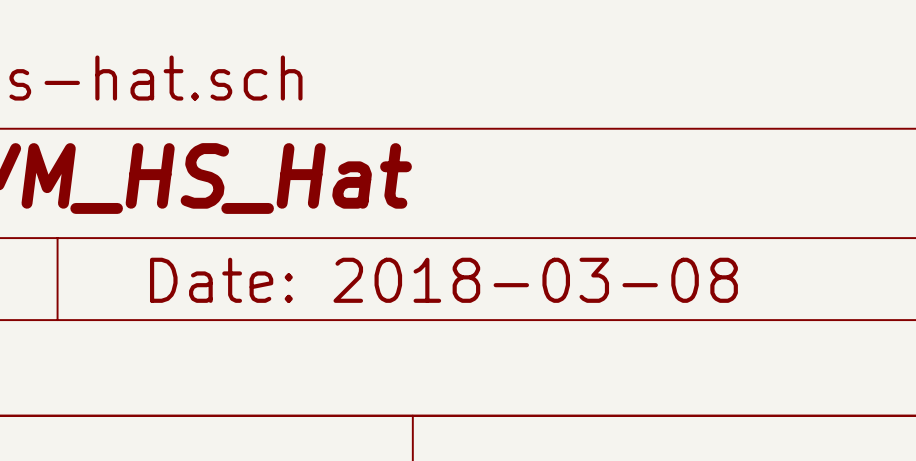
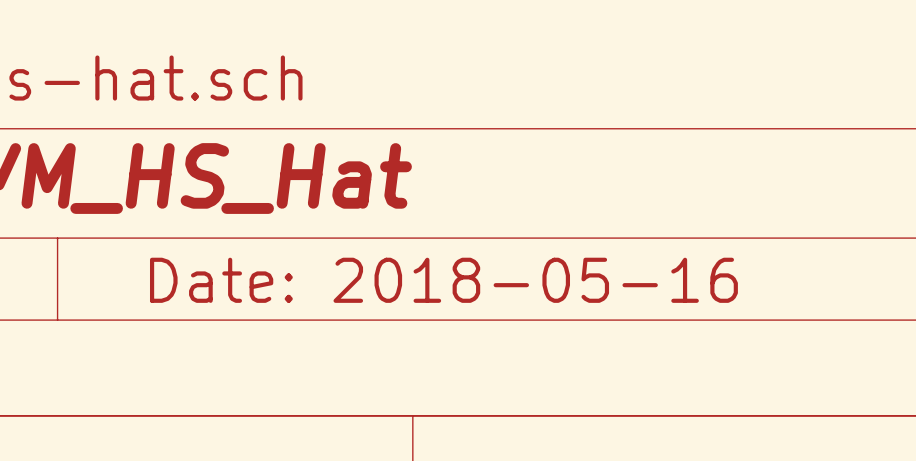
title block: Date: 2018-03-08 (443, 280) -> Date: 2018-05-16 (443, 280)

